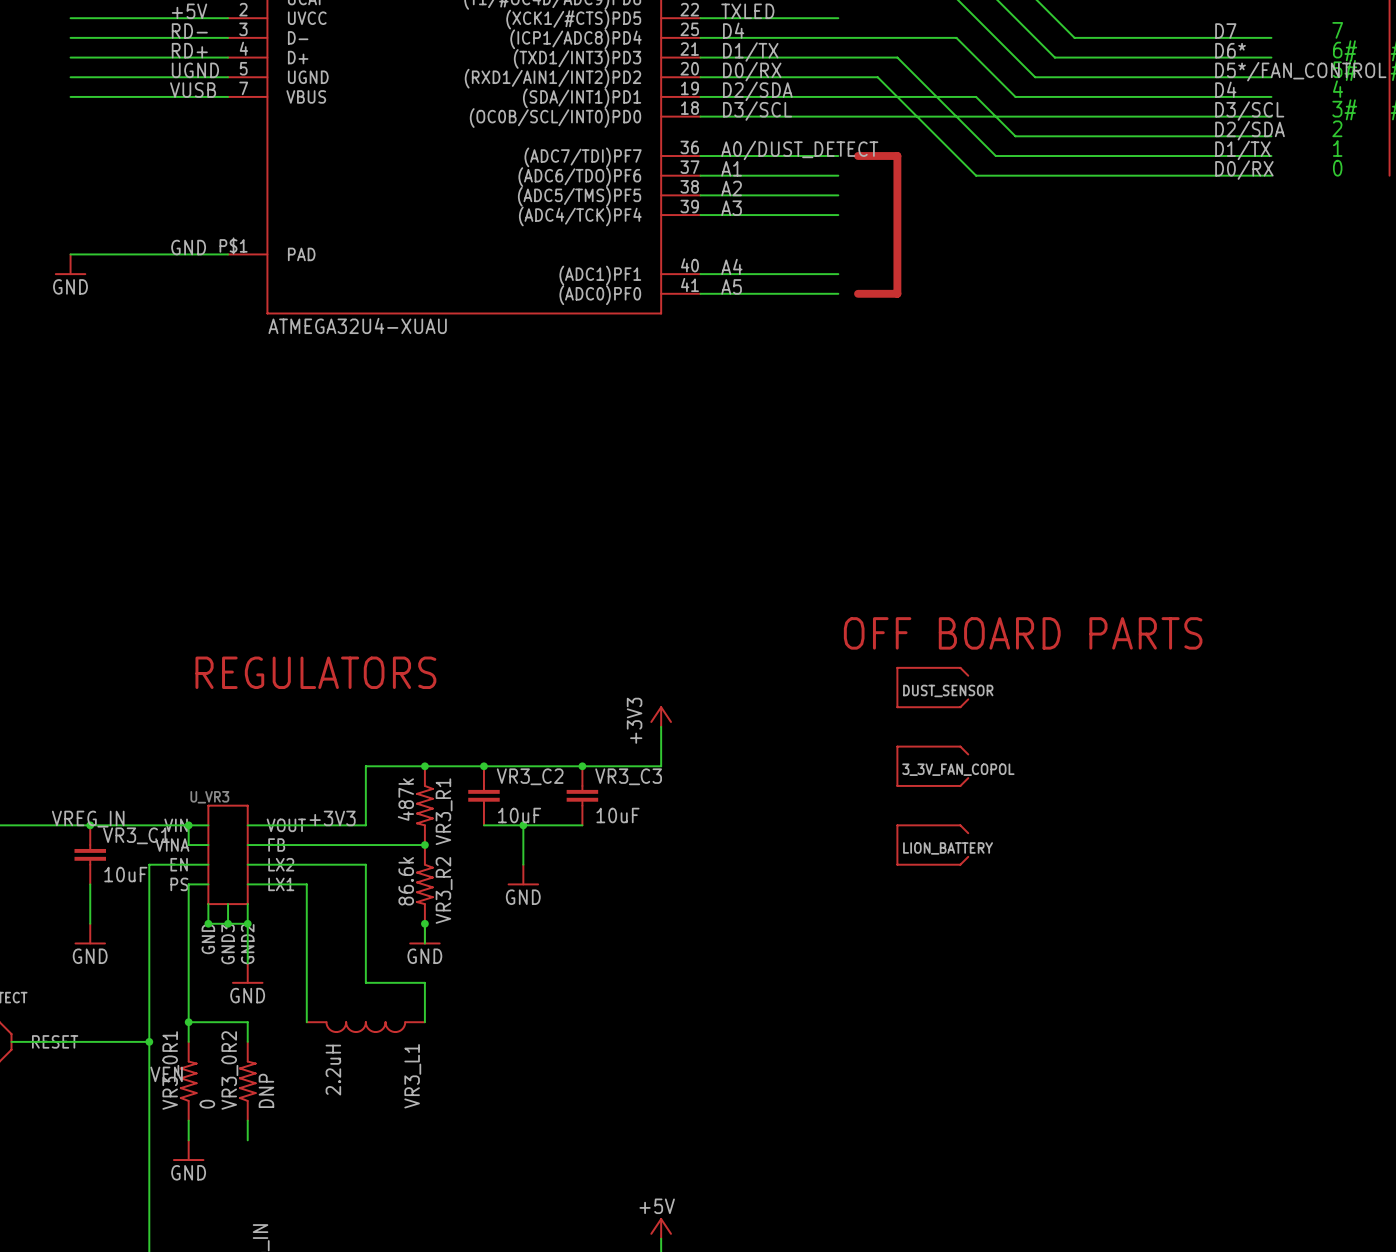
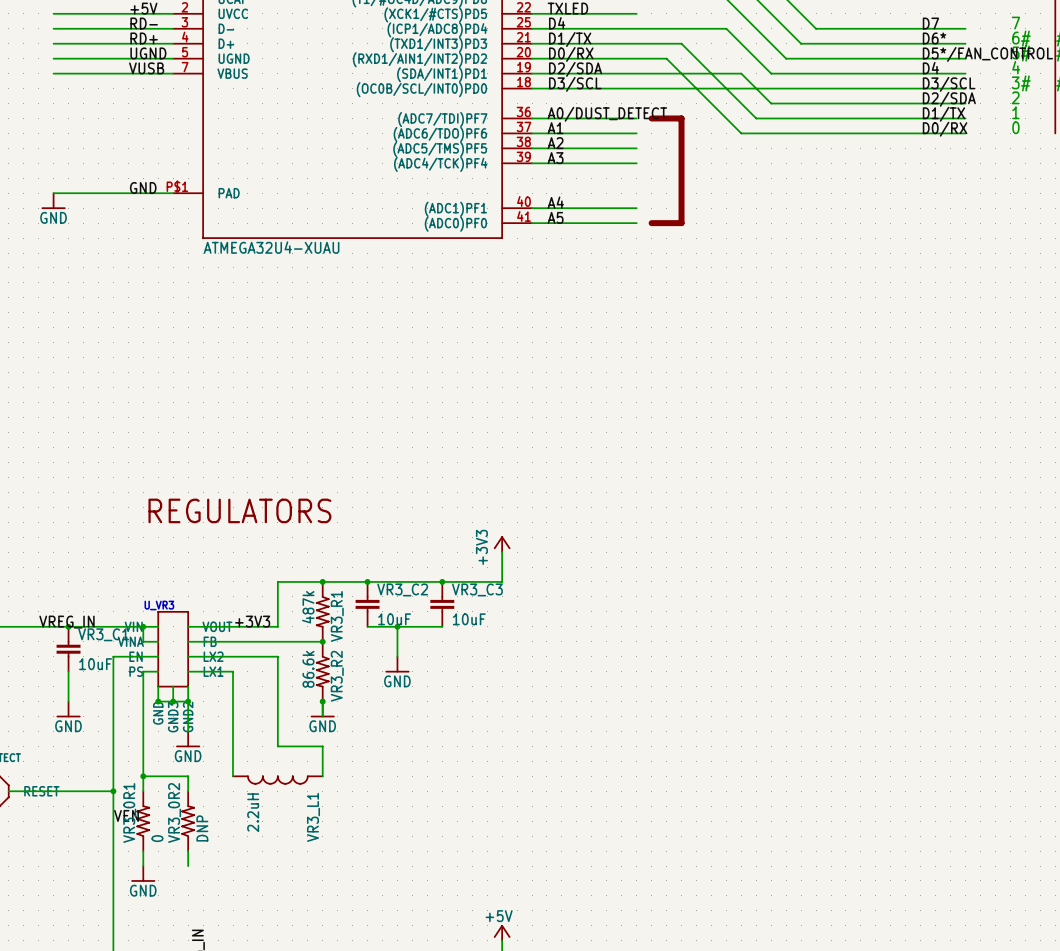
text: OFF BOARD PARTS (1023, 633) -> none
DUST_SENSOR: (932, 687) -> none
3_3V_FAN_COPOL: (932, 766) -> none
LION_BATTERY: (932, 845) -> none

